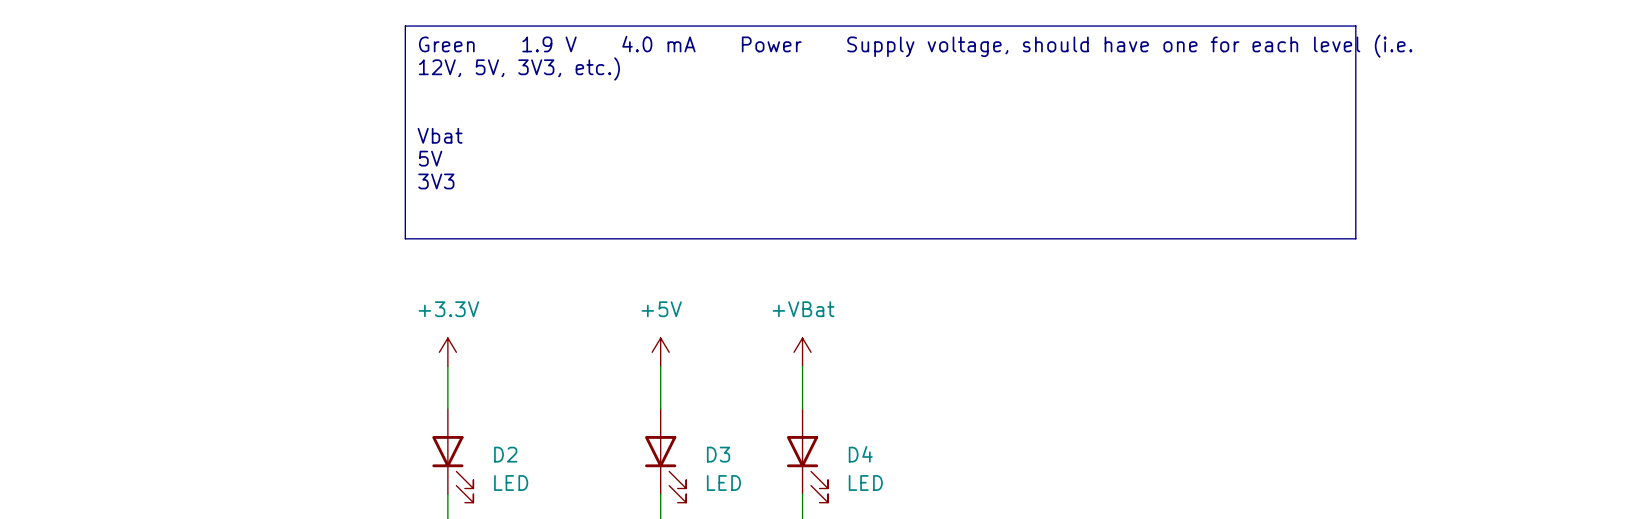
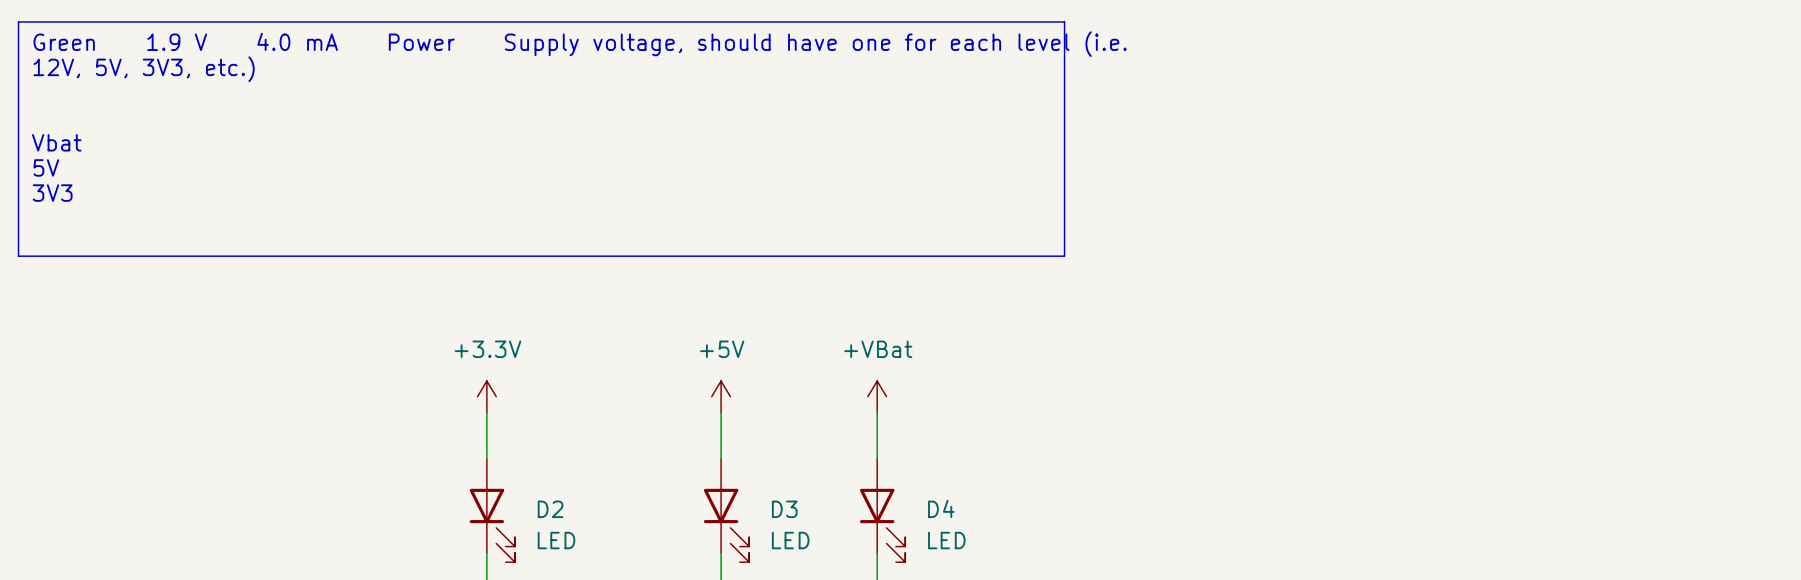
line: none -> (18, 22) (1064, 22) (1064, 256) (18, 256) (18, 22)
line: (405, 26) (1355, 26) (1355, 238) (405, 238) (405, 26) -> none
text: none -> Green 1.9 V 4.0 mA Power Supply voltage, should have one for each level (i.e. (580, 44)
text: Green 1.9 V 4.0 mA Power Supply voltage, should have one for each level (i.e. (915, 46) -> none
text: none -> 12V, 5V, 3V3, etc.) (144, 69)
text: 12V, 5V, 3V3, etc.) (519, 68) -> none
text: none -> Vbat (56, 142)
text: Vbat (440, 135) -> none
text: none -> 5V (46, 167)
text: 5V (430, 158) -> none
text: none -> 3V3 (52, 193)
text: 3V3 (436, 181) -> none

